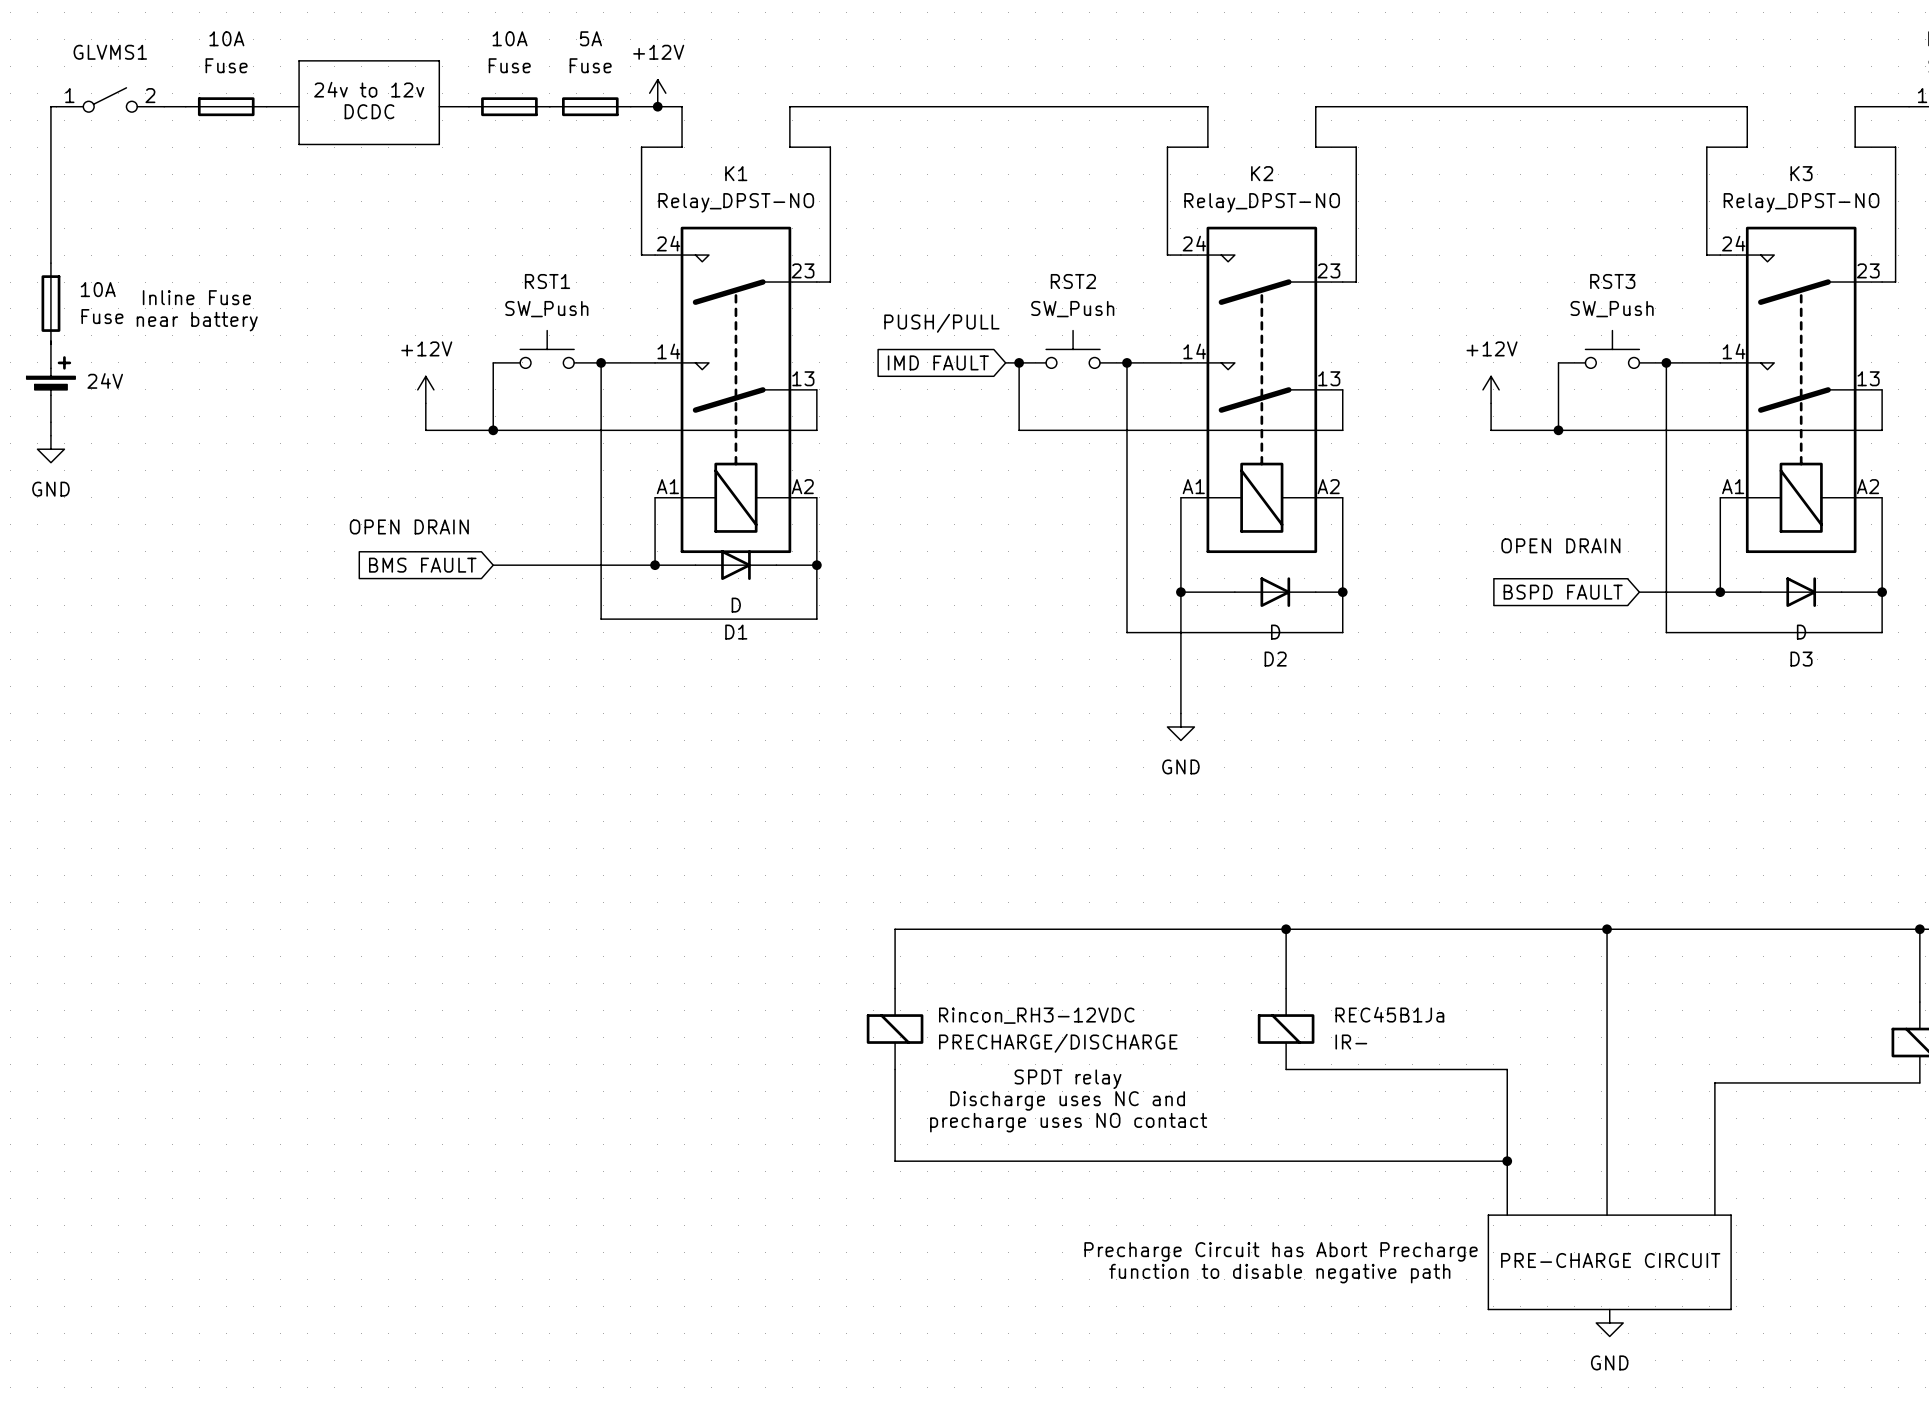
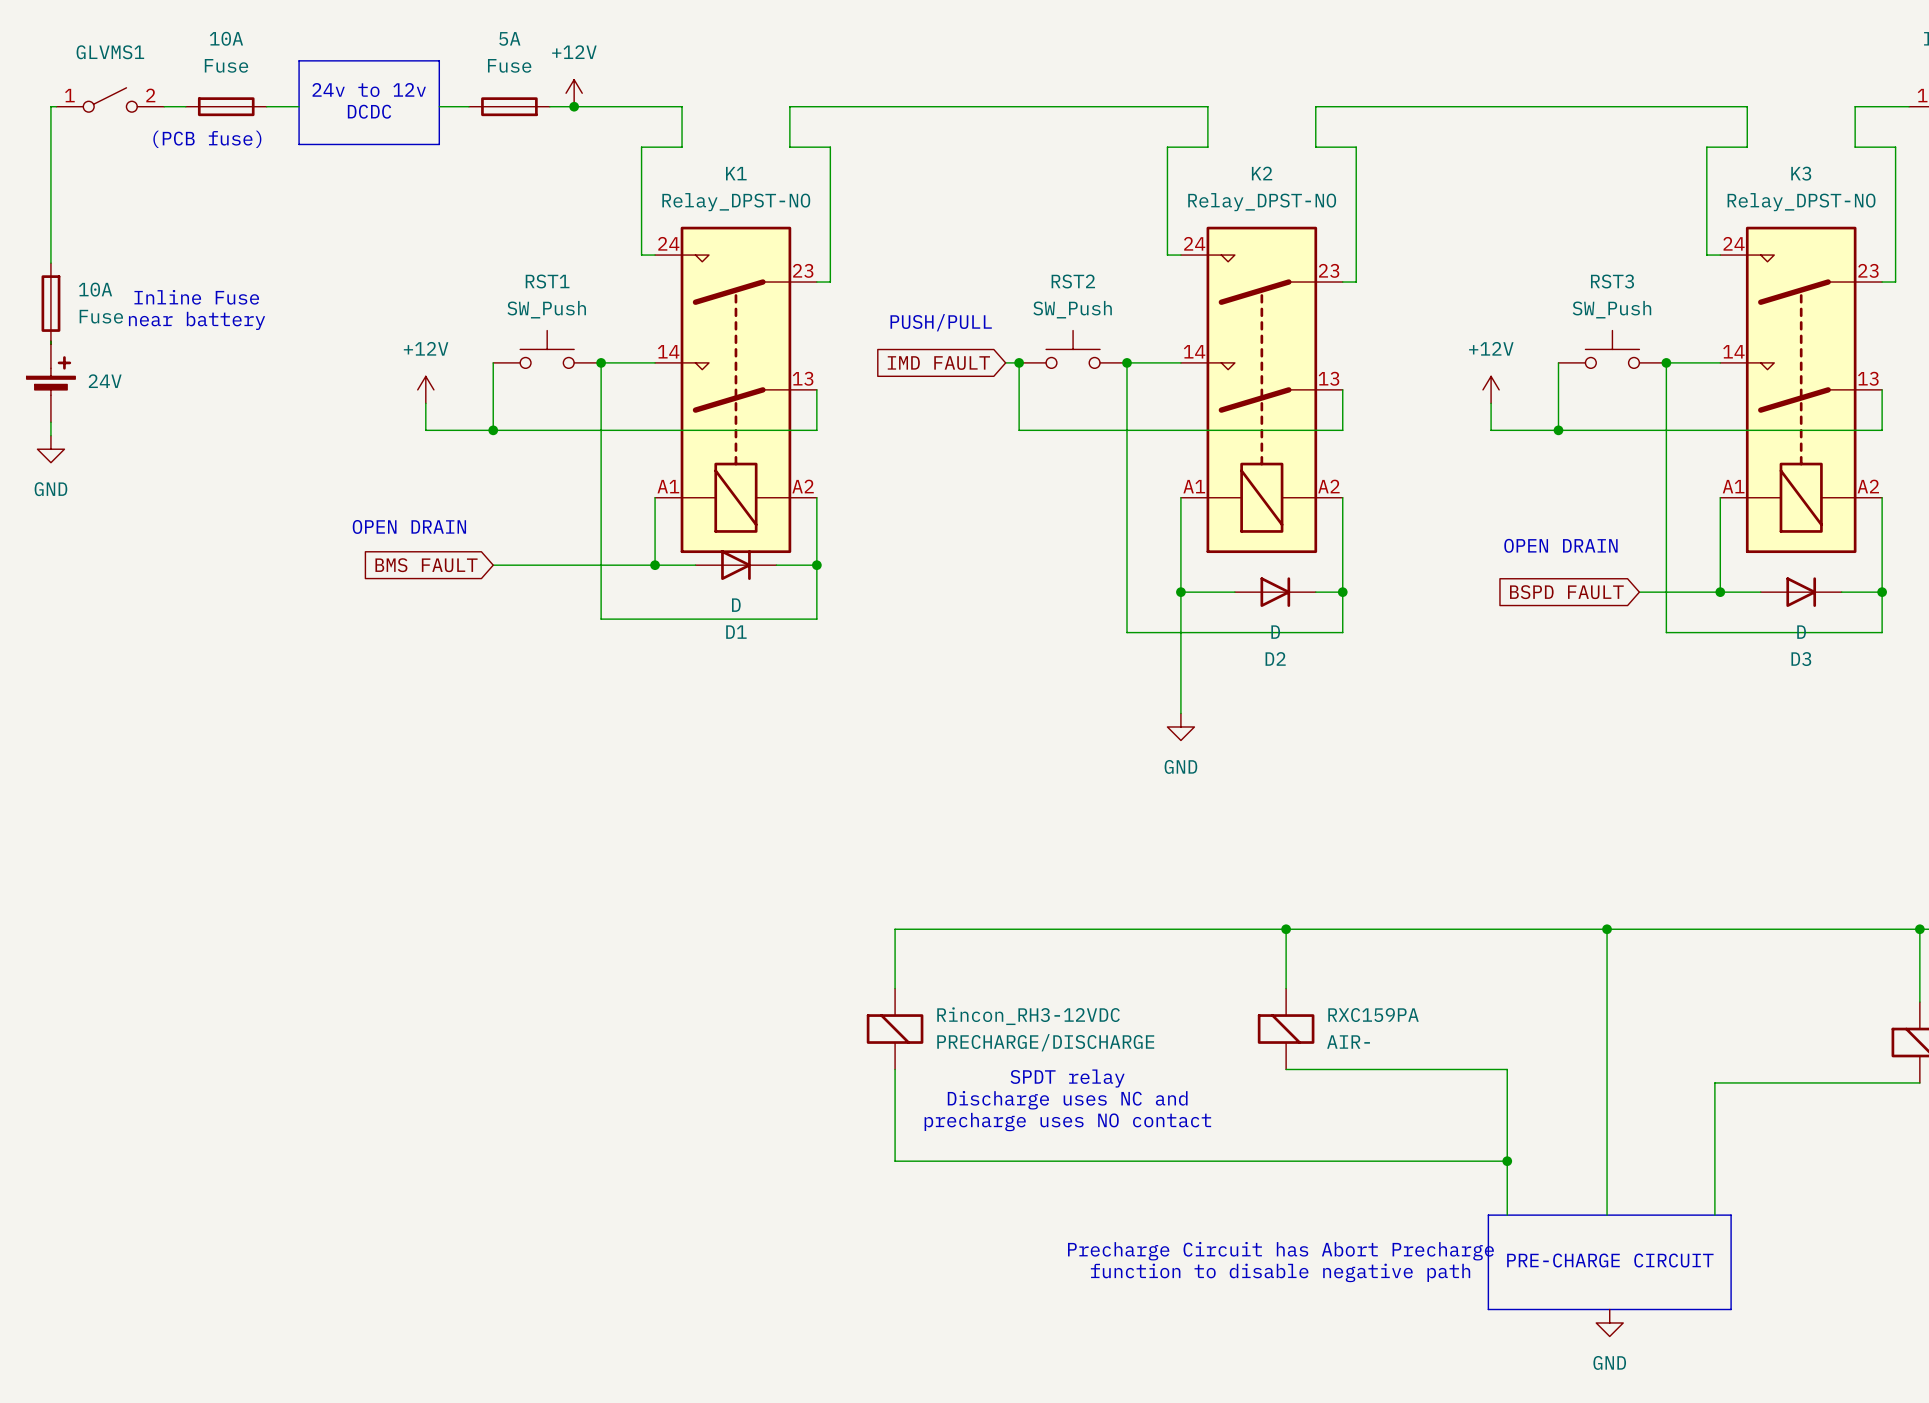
10A name: 10A (510, 38) -> 5A (509, 38)
power symbol position: +12V (657, 93) -> +12V (574, 93)
junction: none -> (574, 106)
5A: Fuse (590, 106) -> none
junction: (657, 106) -> none
text: none -> (PCB fuse) (207, 139)
REC45B1Ja name: REC45B1Ja (1389, 1014) -> RXC159PA (1373, 1015)
REC45B1Ja value: IR- (1351, 1042) -> AIR- (1348, 1042)

